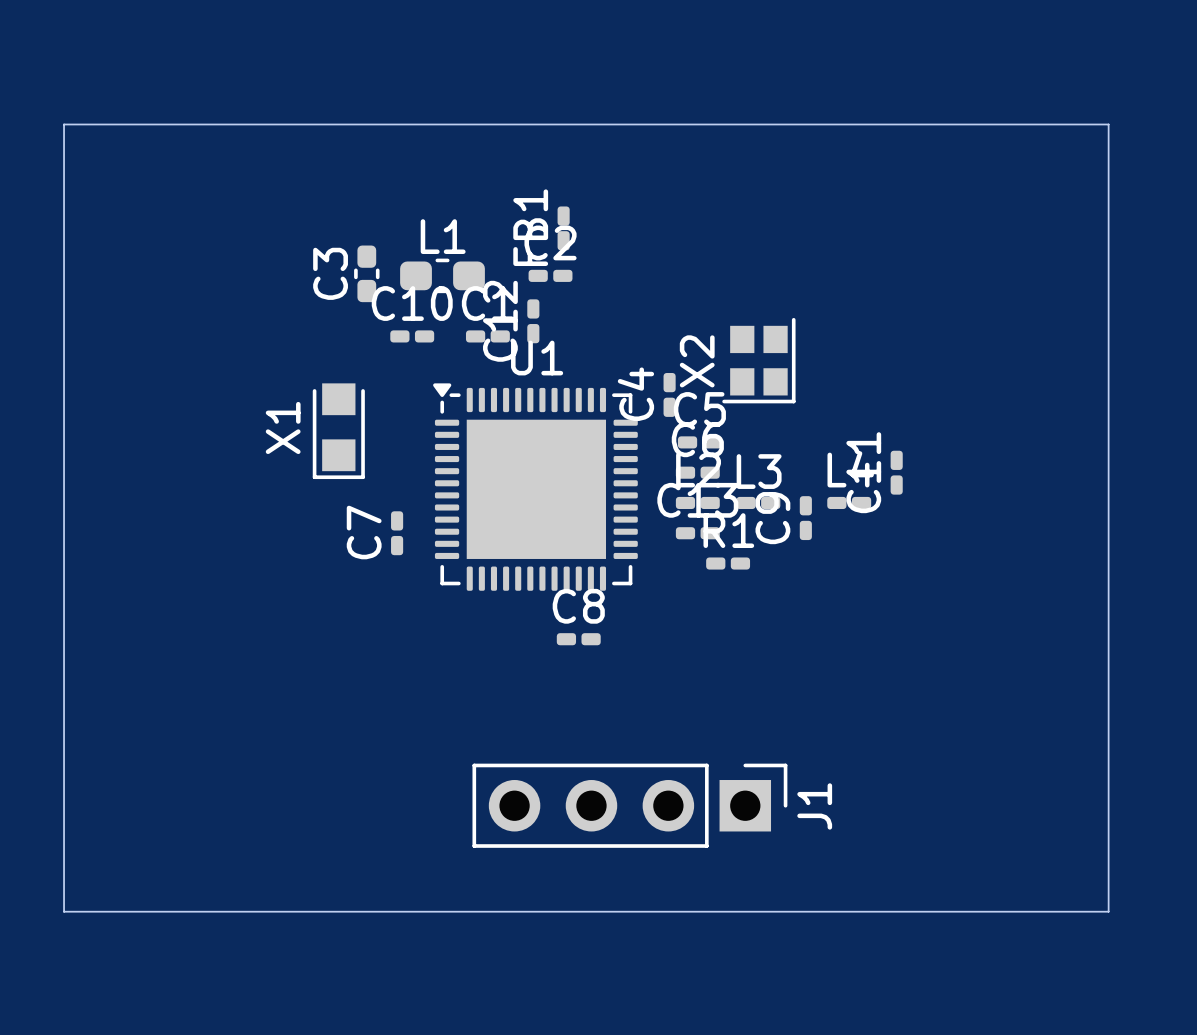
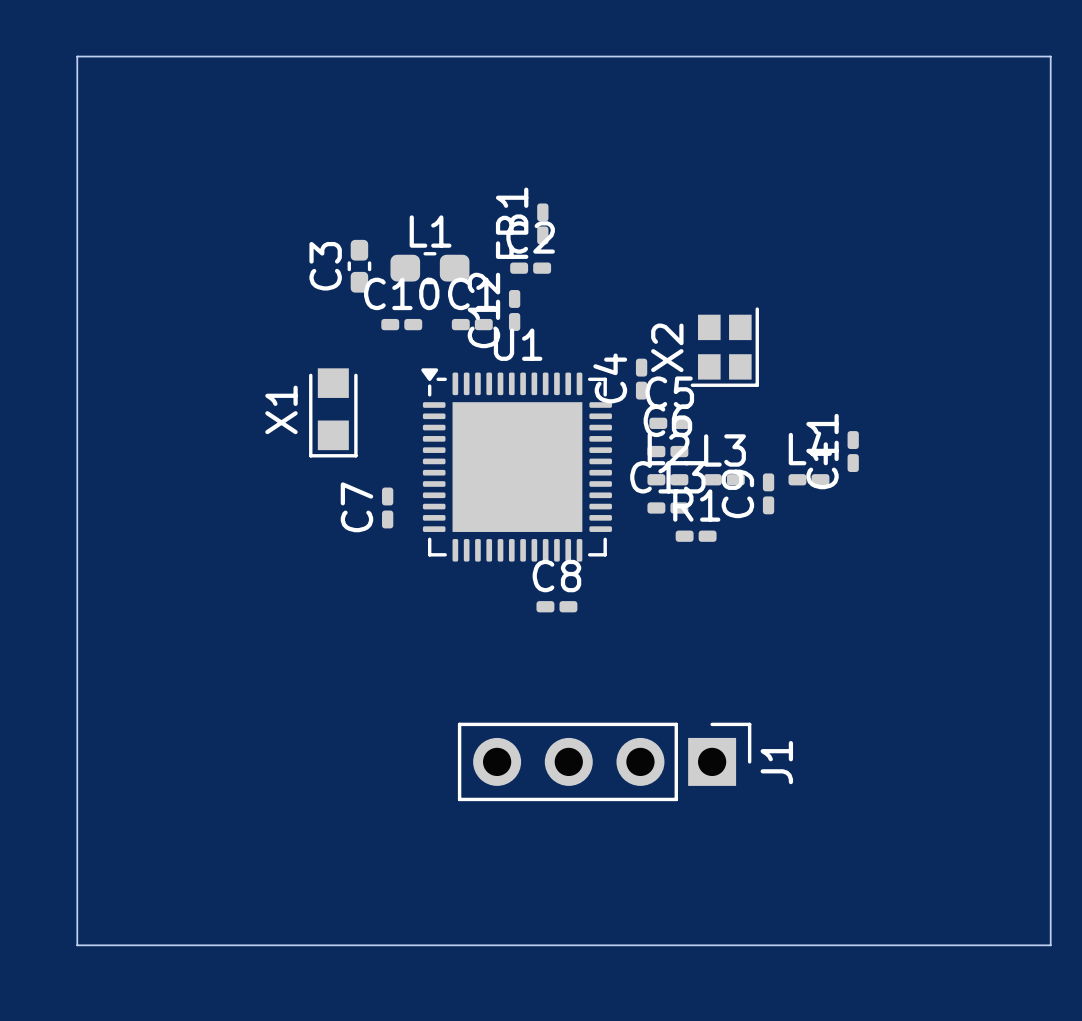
board edge: (64, 124) (1108, 124) -> (77, 127) (77, 56) (1050, 56) (1050, 127)
board edge: (64, 911) (1108, 911) -> (77, 860) (77, 945) (1050, 945) (1050, 860)

